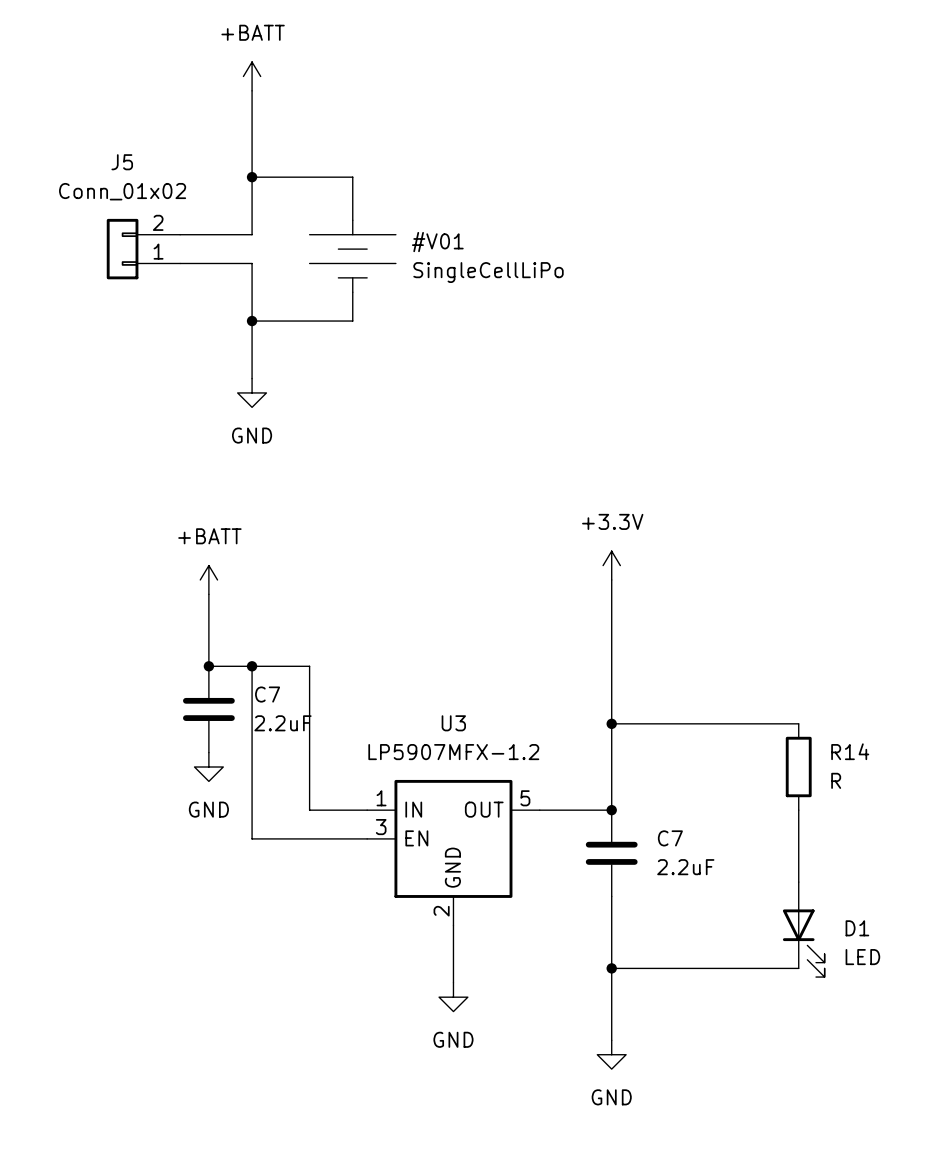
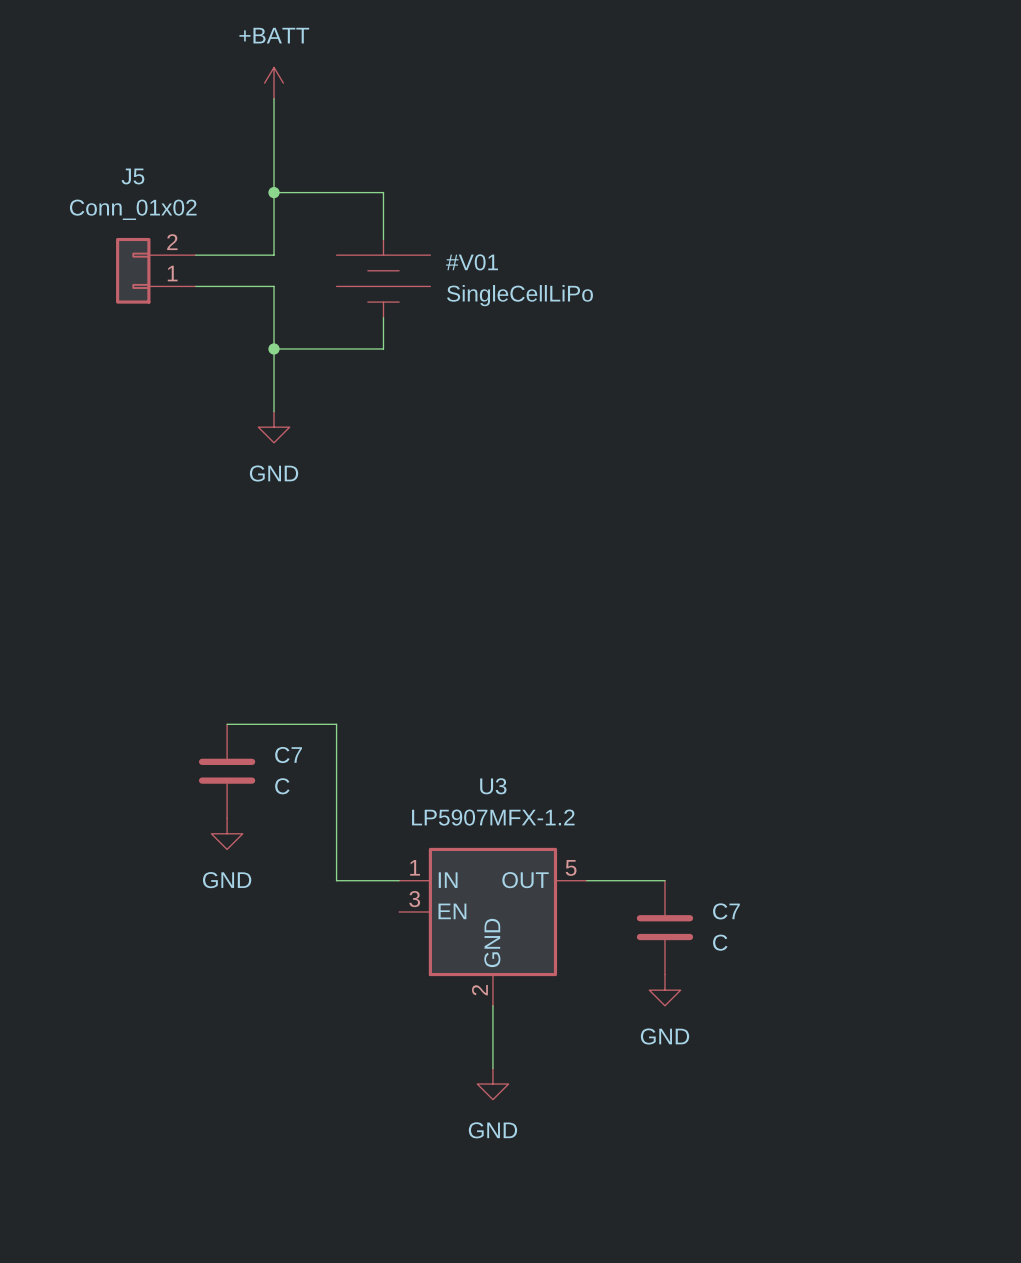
power symbol: +3.3V (611, 565) -> none
power symbol: +BATT (208, 579) -> none
wire: (611, 579) (611, 810) -> none
wire: (208, 594) (208, 666) -> none
junction: (208, 666) -> none
wire: (252, 666) (252, 838) (367, 838) -> none
junction: (252, 666) -> none
C7 value: 2.2uF (282, 723) -> C (282, 786)
wire: (611, 723) (798, 723) -> none
junction: (611, 723) -> none
R14: R (798, 767) -> none
junction: (611, 810) -> none
wire: (798, 810) (798, 882) -> none
C7 value: 2.2uF (685, 867) -> C (720, 942)
wire: (611, 896) (611, 1040) -> none
D1: LED (803, 929) -> none
wire: (611, 968) (798, 968) -> none
junction: (611, 968) -> none
power symbol position: GND (611, 1054) -> GND (664, 990)

